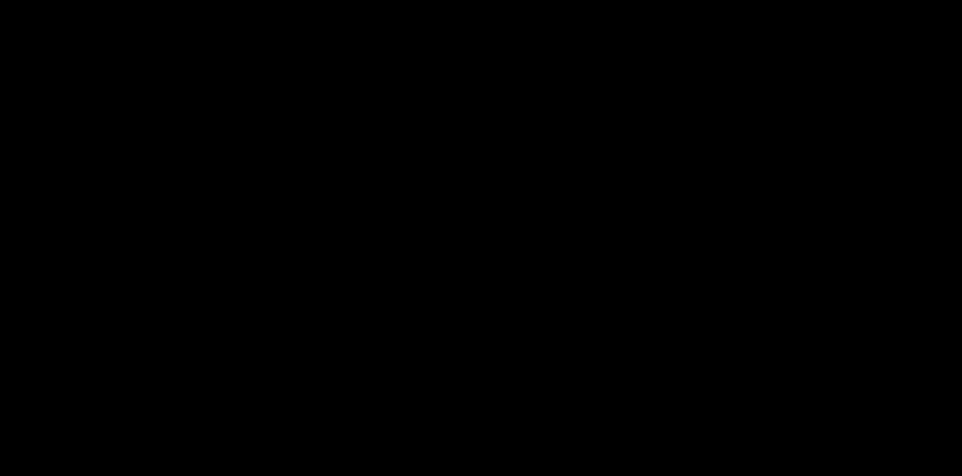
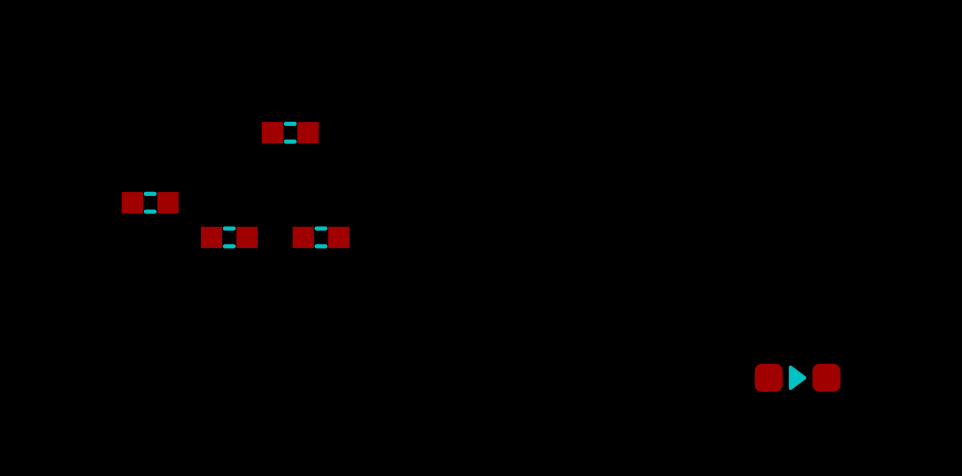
part: none -> (290, 132)
part: none -> (150, 202)
part: none -> (229, 237)
part: none -> (321, 237)
part: none -> (797, 377)

